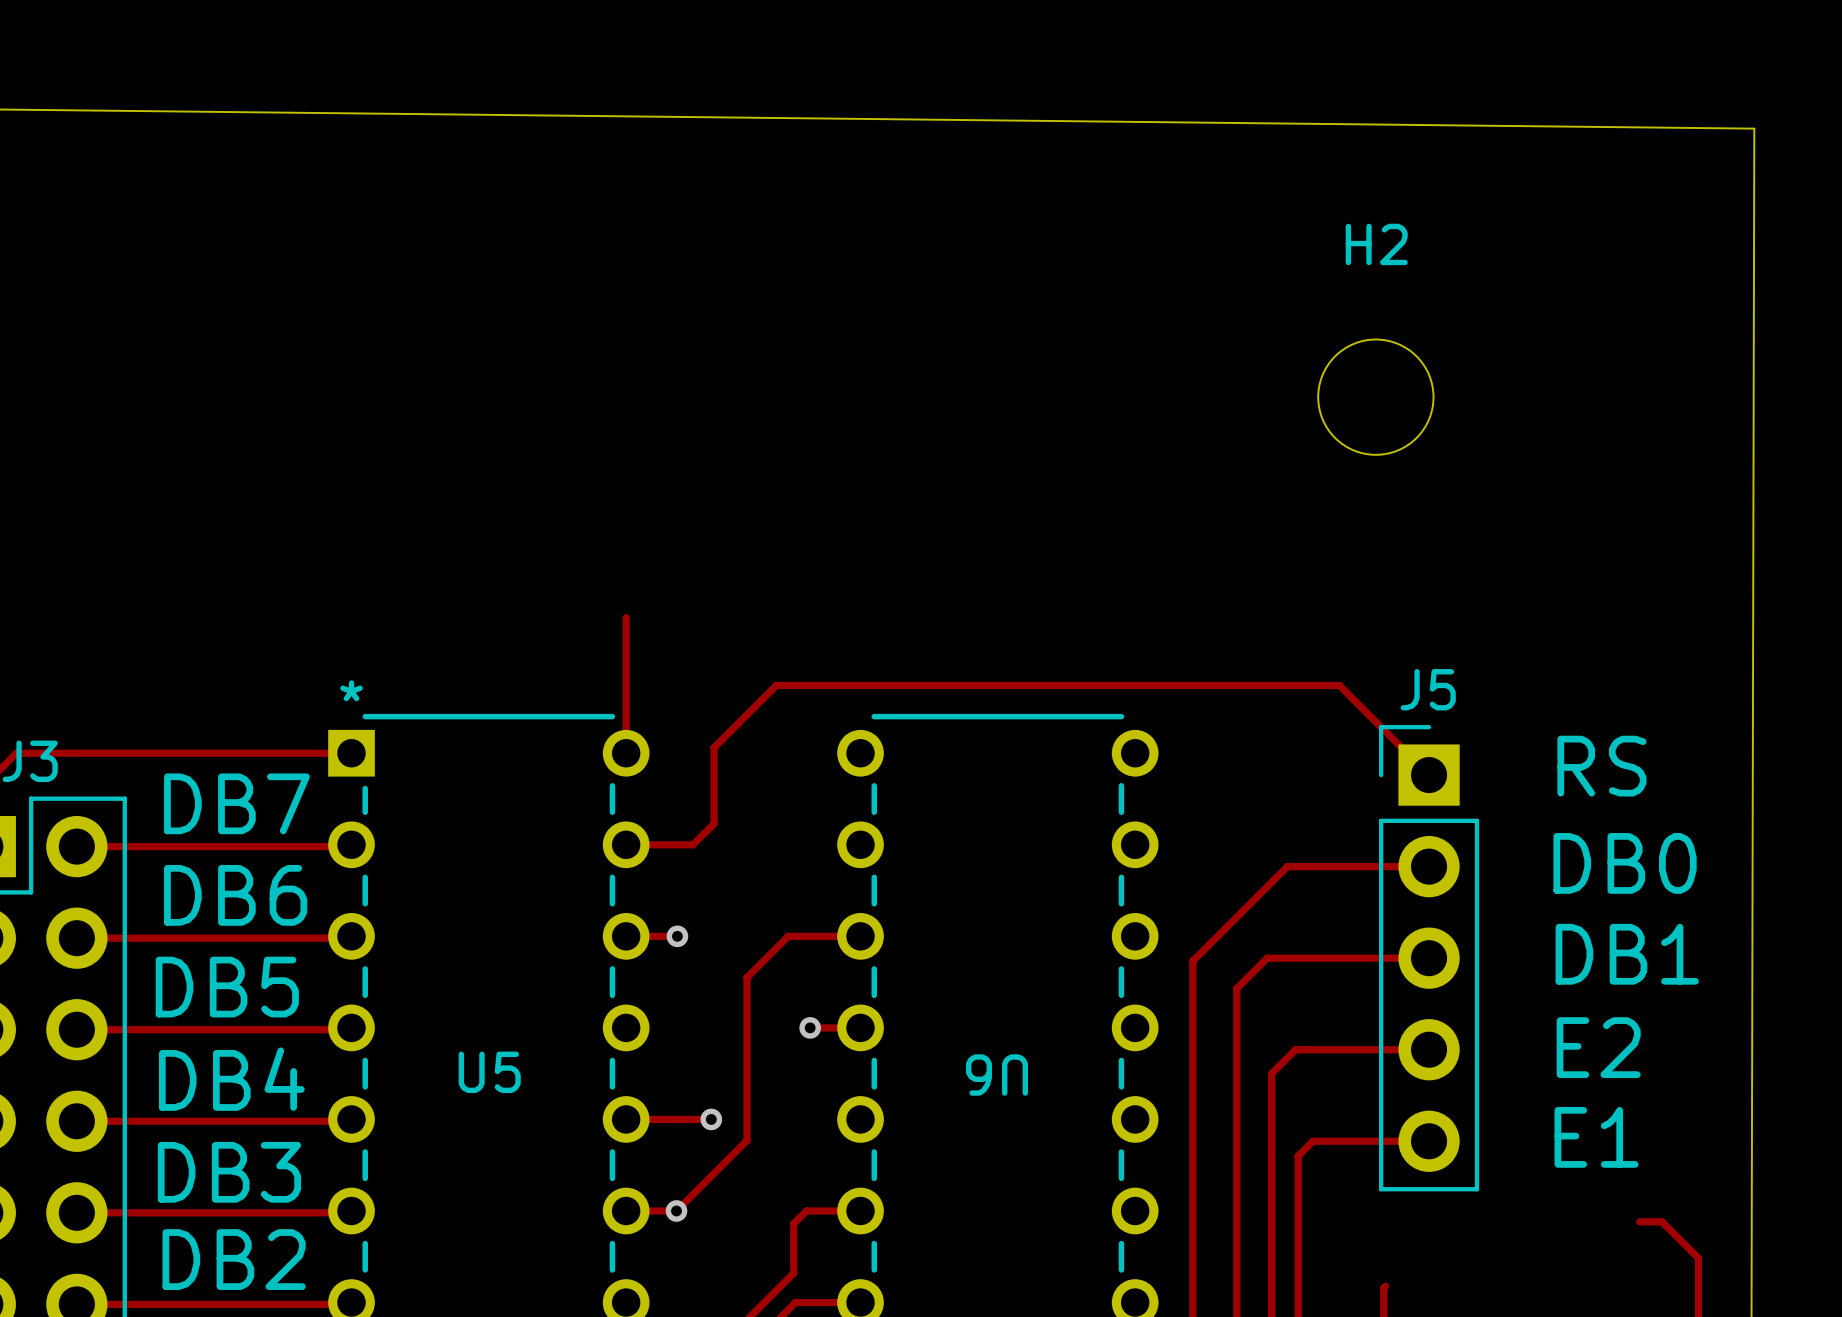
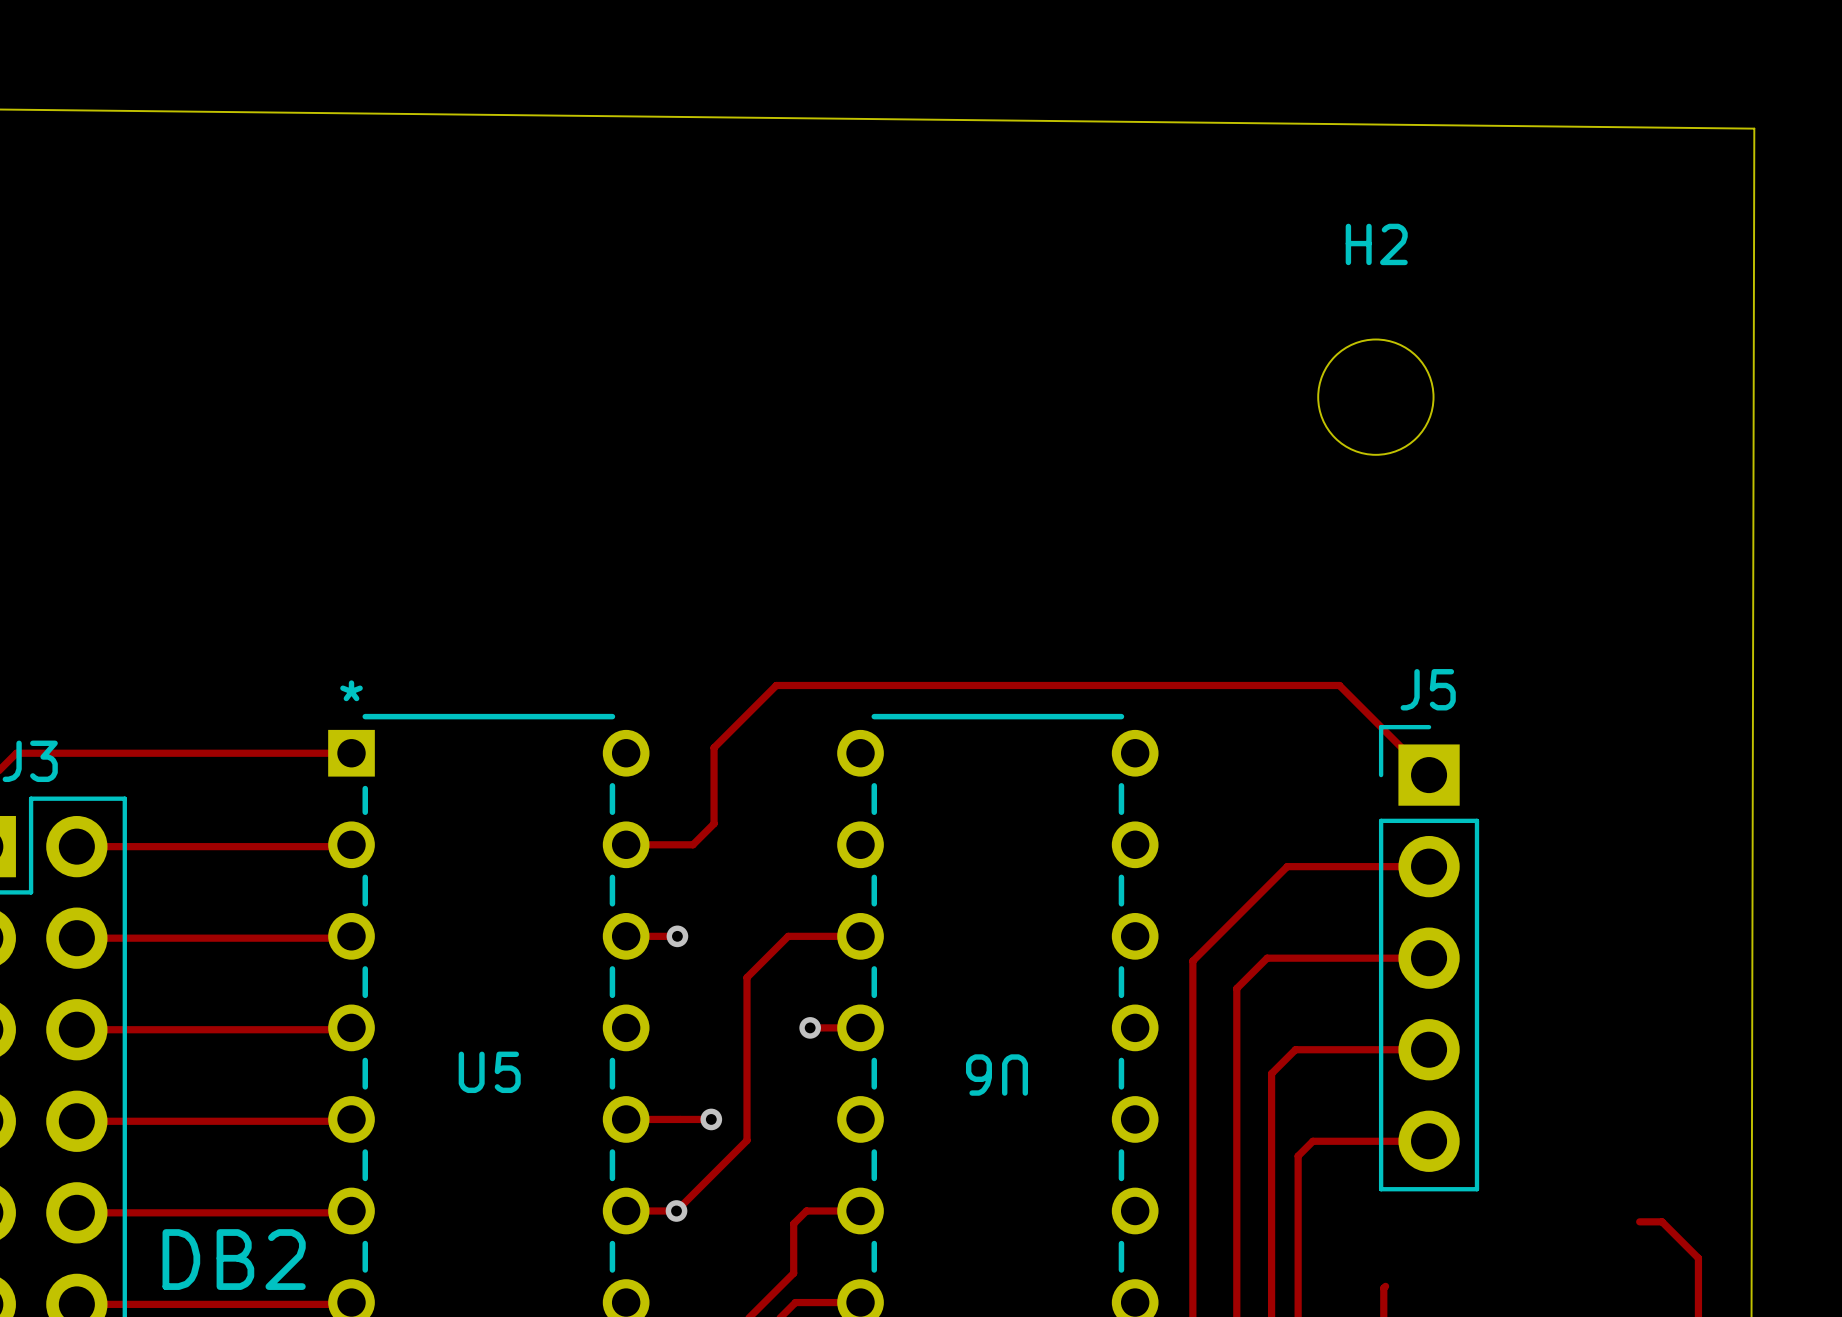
track: (626, 617) (626, 753) -> none
text: RS (1601, 766) -> none
text: DB7 (236, 803) -> none
text: DB0 (1625, 863) -> none
text: DB6 (235, 895) -> none
text: DB1 (1627, 954) -> none
text: DB5 (227, 987) -> none
text: E2 (1598, 1047) -> none
text: DB4 (231, 1079) -> none
text: E1 (1596, 1137) -> none
text: DB3 (229, 1172) -> none

